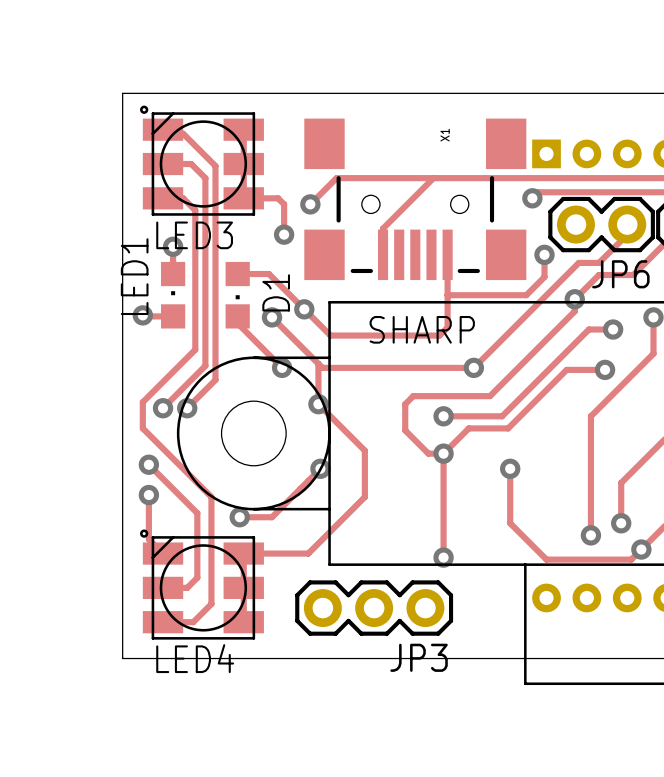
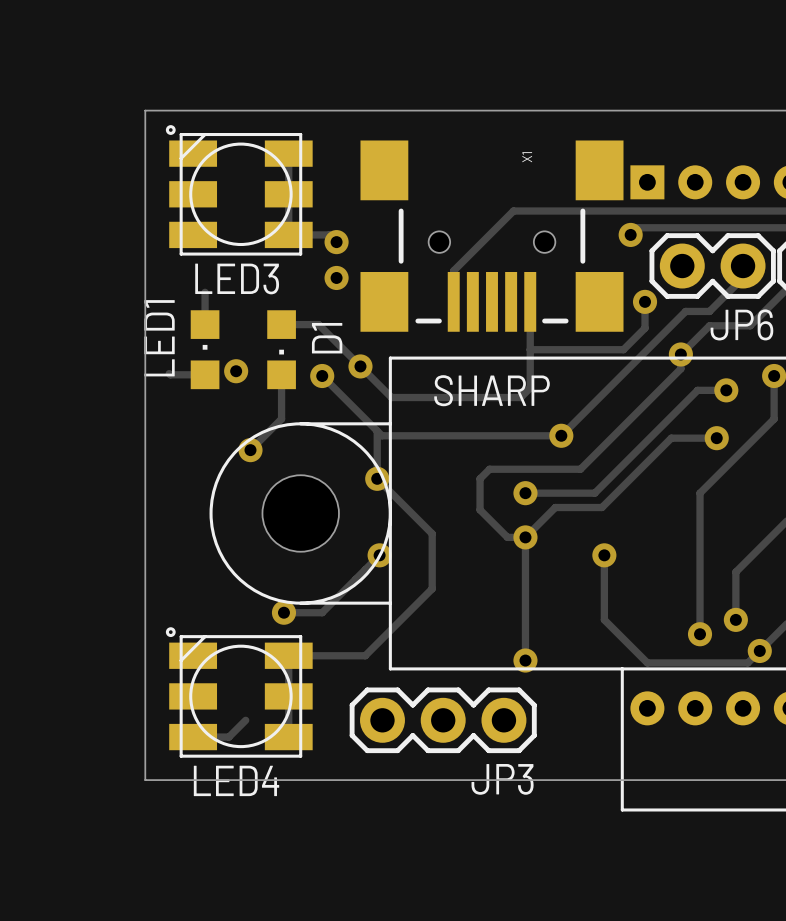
track: (163, 129) (167, 133) (183, 133) (215, 166) (215, 379) (187, 408) -> none
track: (163, 164) (191, 164) (205, 178) (205, 365) (163, 408) -> none
track: (433, 178) (336, 178) (310, 204) -> none
track: (163, 198) (183, 198) (195, 210) (195, 349) (142, 402) (142, 428) (211, 497) (211, 604) (207, 608) -> none
track: (284, 204) (284, 234) -> none
via position: (310, 204) -> (336, 242)
via: (173, 246) -> none
via: none -> (236, 371)
via: (142, 315) -> none
track: (237, 323) (282, 367) -> (281, 383) (281, 419) (250, 450)
via: (282, 367) -> none
via: none -> (250, 450)
via: (163, 408) -> none
via: (187, 408) -> none
track: (148, 464) (197, 513) (197, 577) (187, 587) (163, 587) -> none
via: (148, 464) -> none
track: (148, 495) (148, 539) (163, 553) -> none
via: (148, 495) -> none

